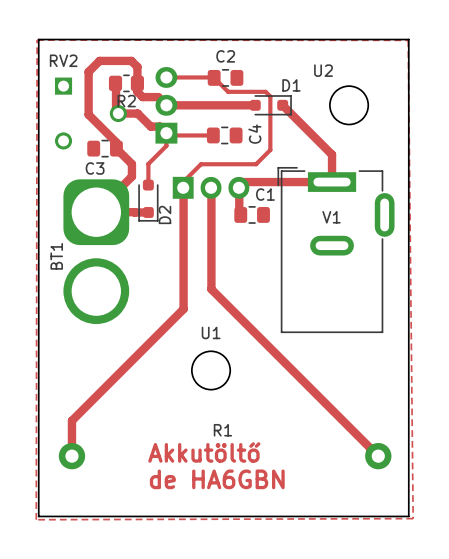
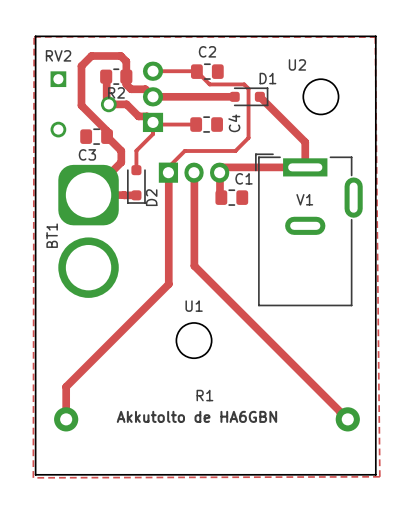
text: Akkutöltő (204, 452) -> none
text: de HA6GBN (217, 479) -> Akkutolto de HA6GBN (196, 416)

